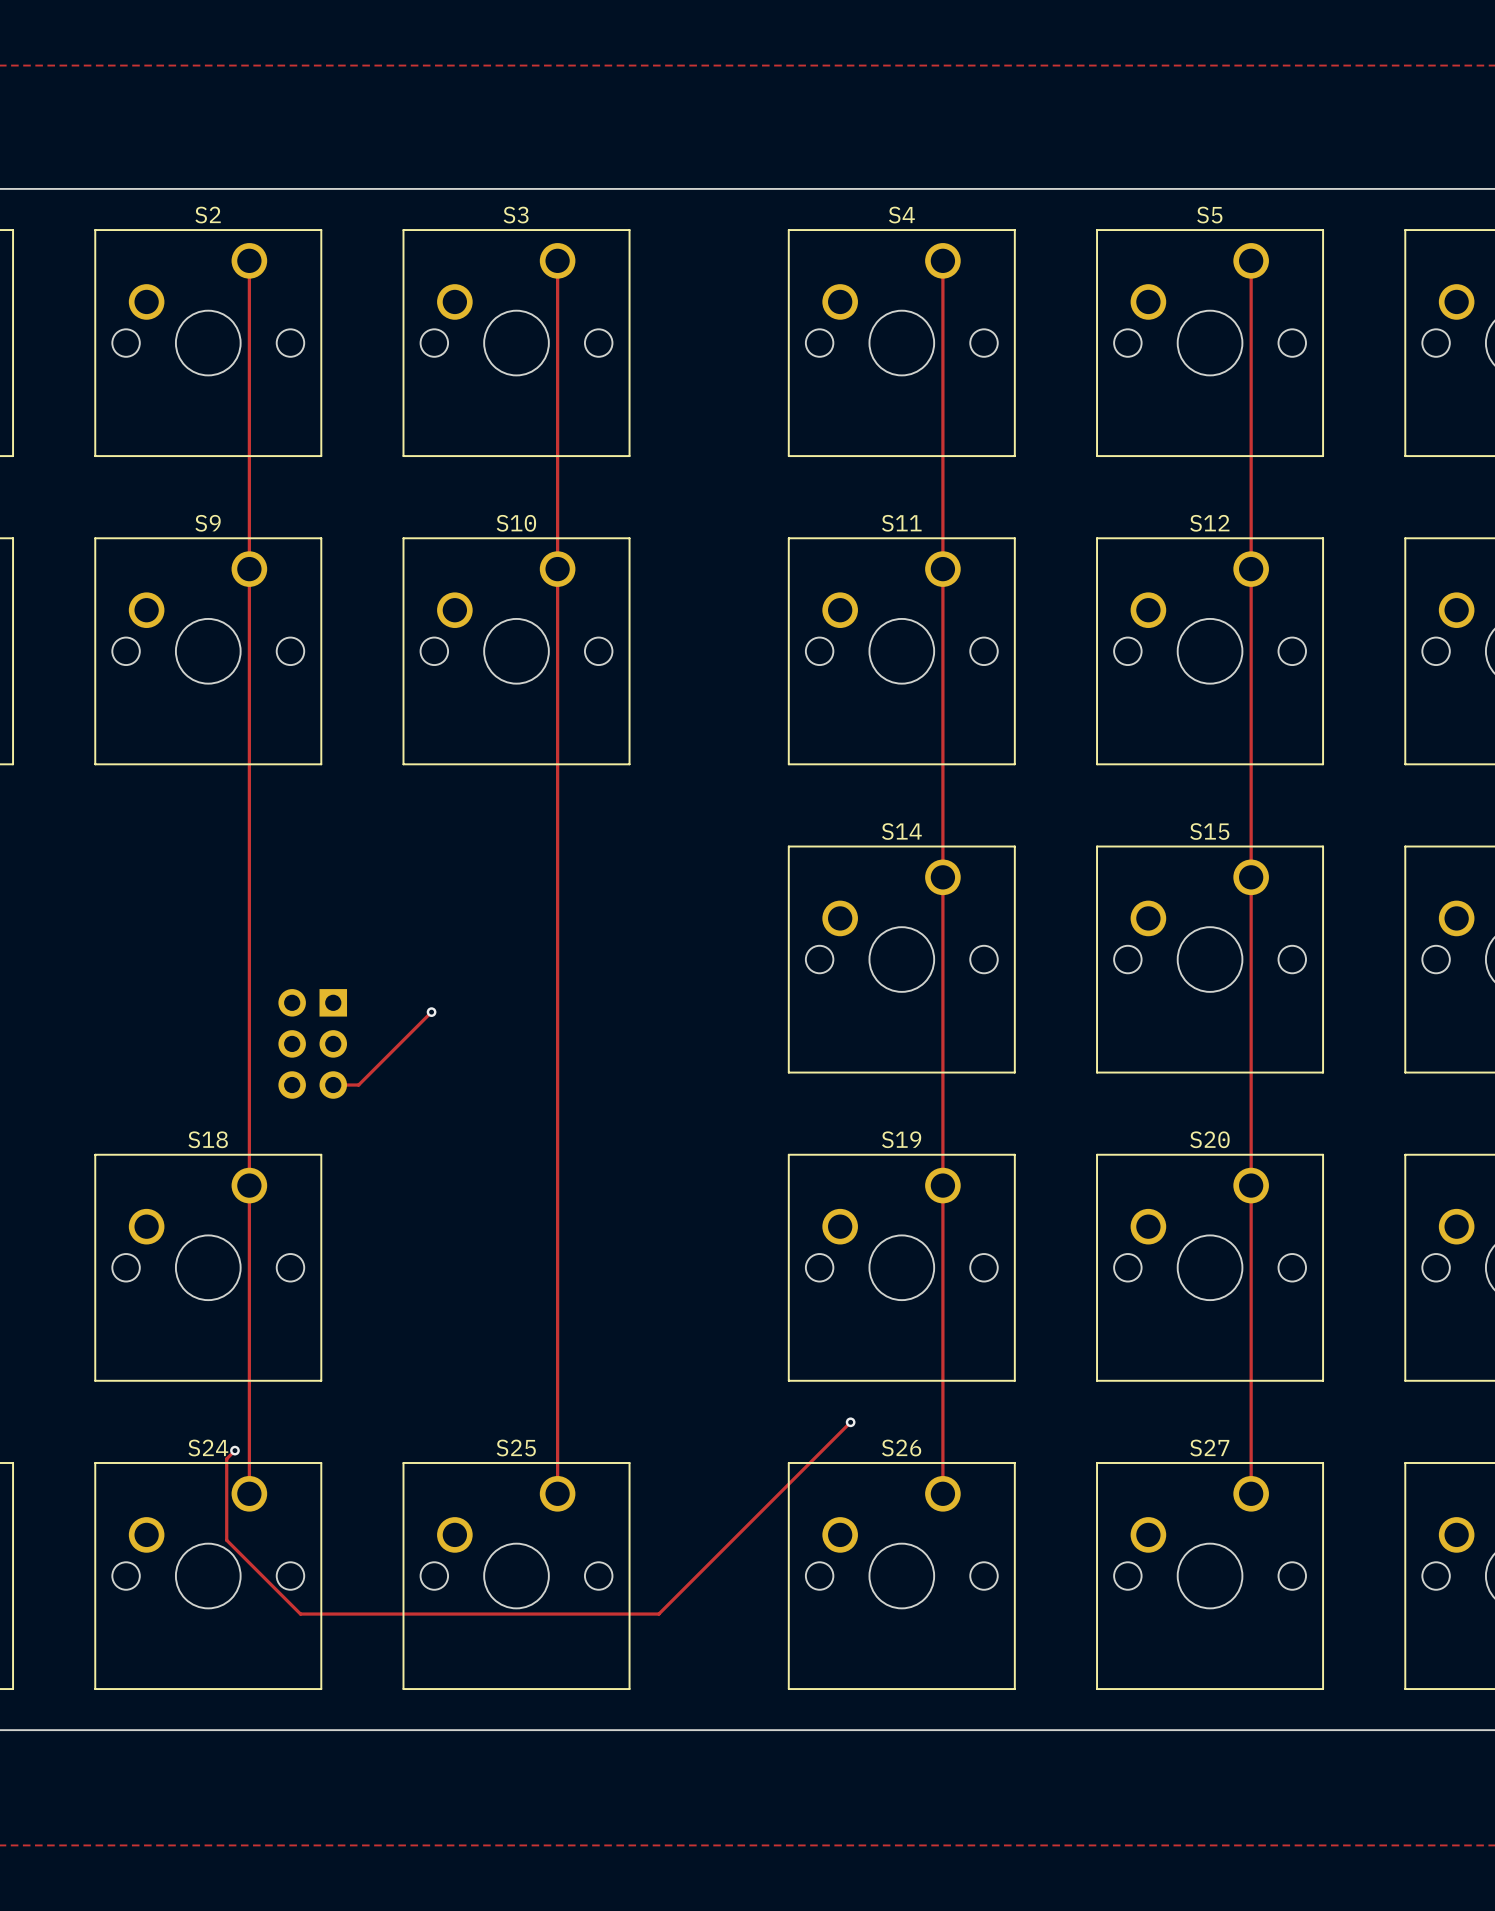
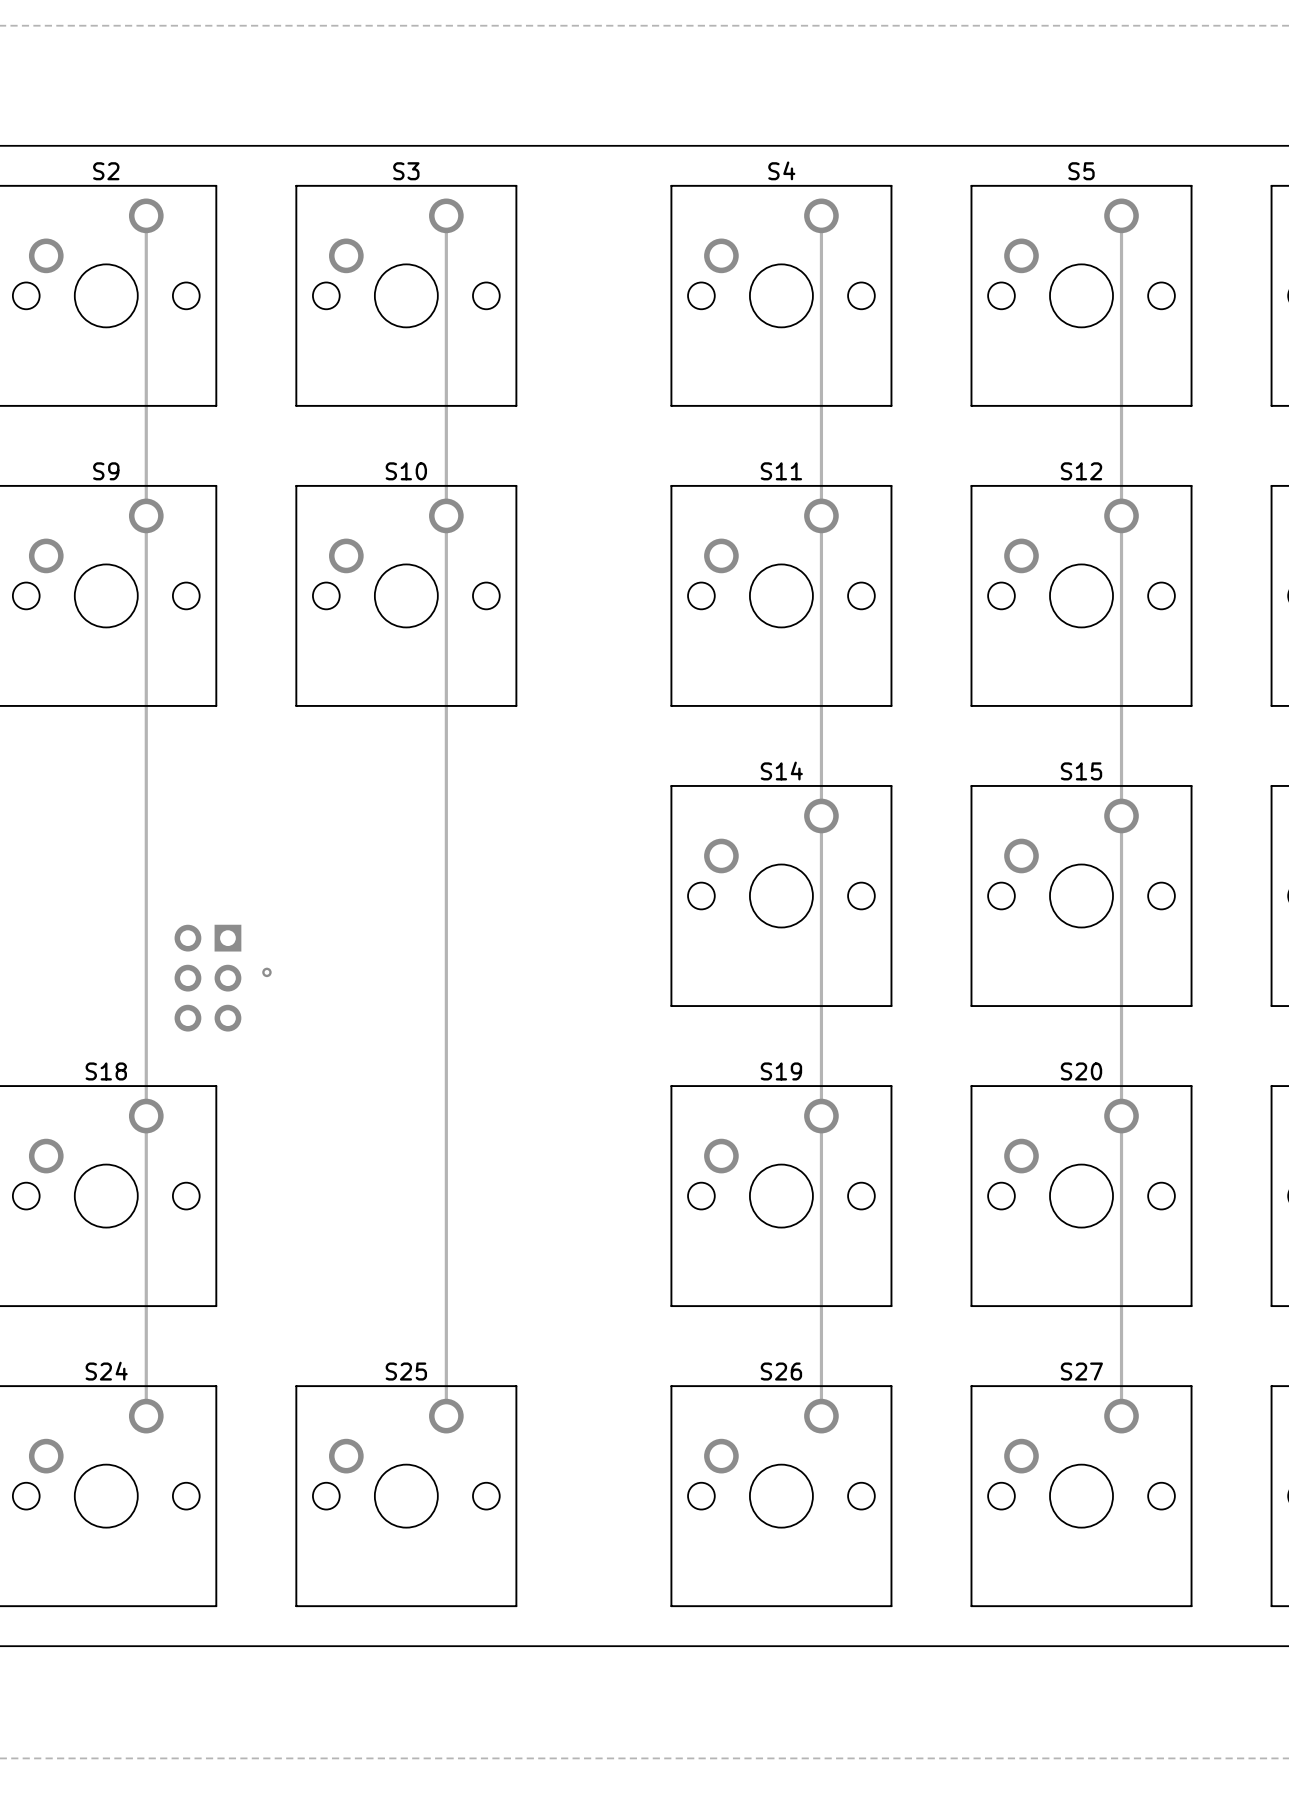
track: (431, 1012) (358, 1085) (333, 1085) -> none
via position: (431, 1012) -> (266, 972)
track: (850, 1422) (658, 1614) (300, 1614) (226, 1540) (226, 1458) (234, 1450) -> none
via: (850, 1422) -> none
via: (234, 1450) -> none

